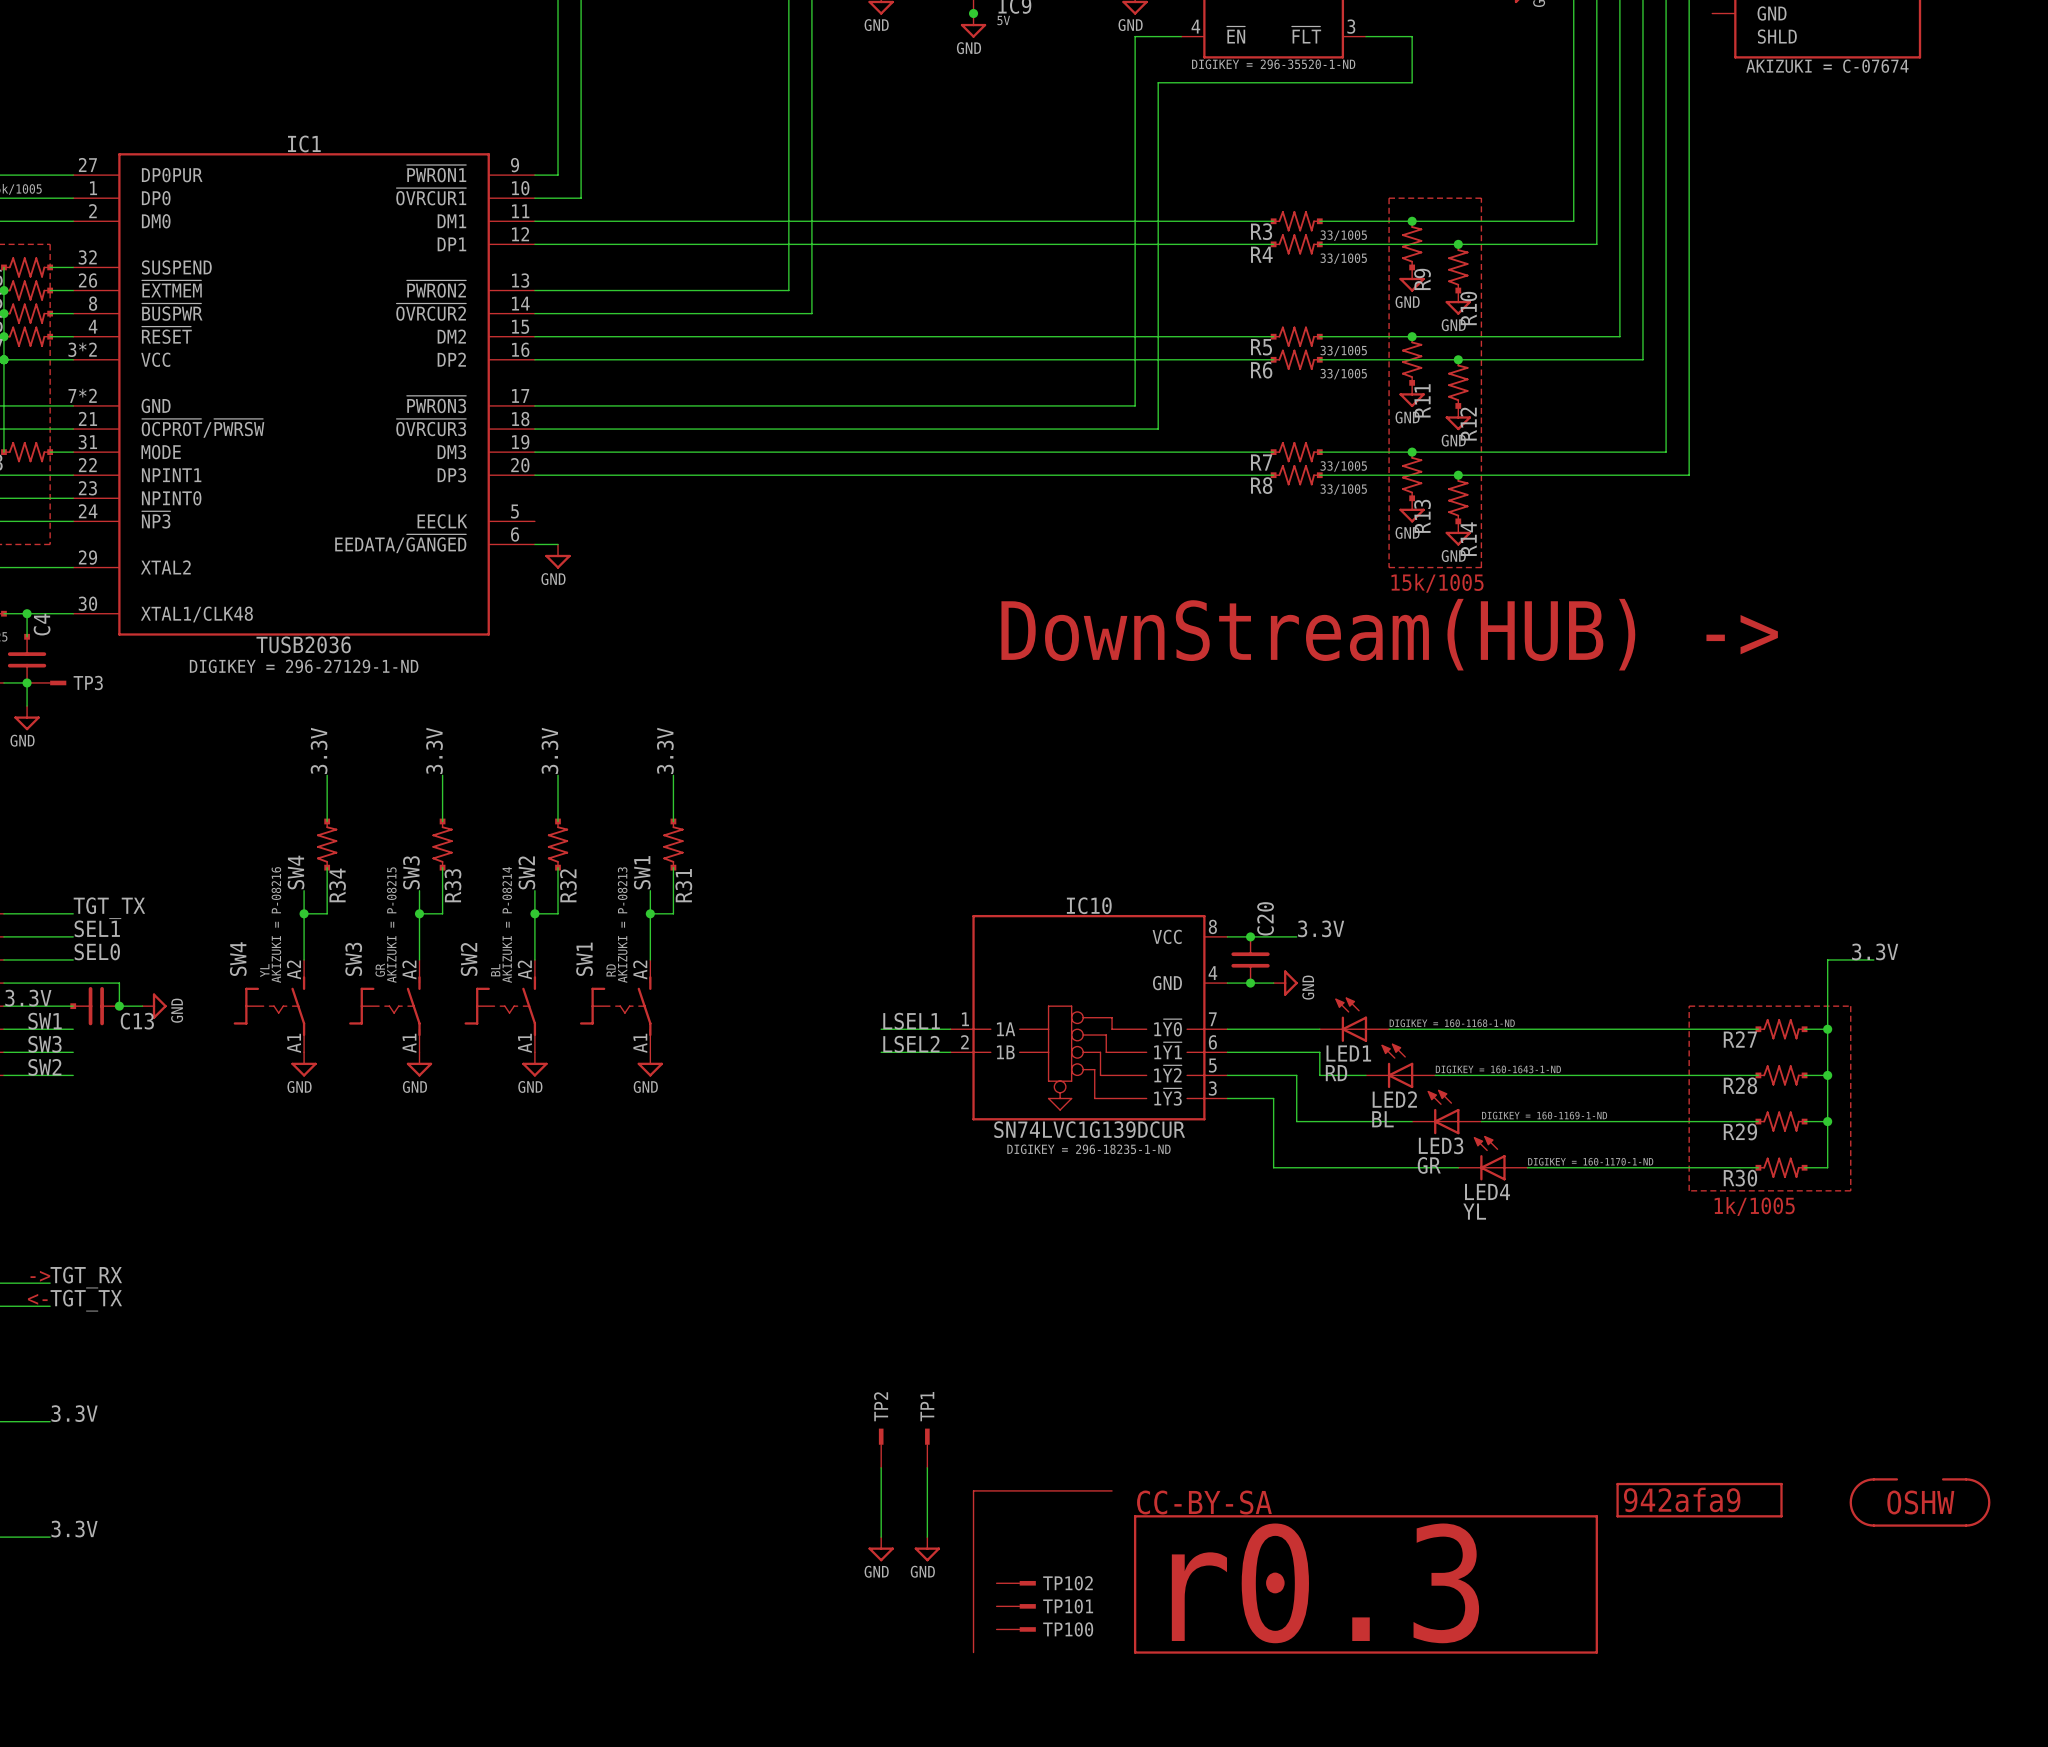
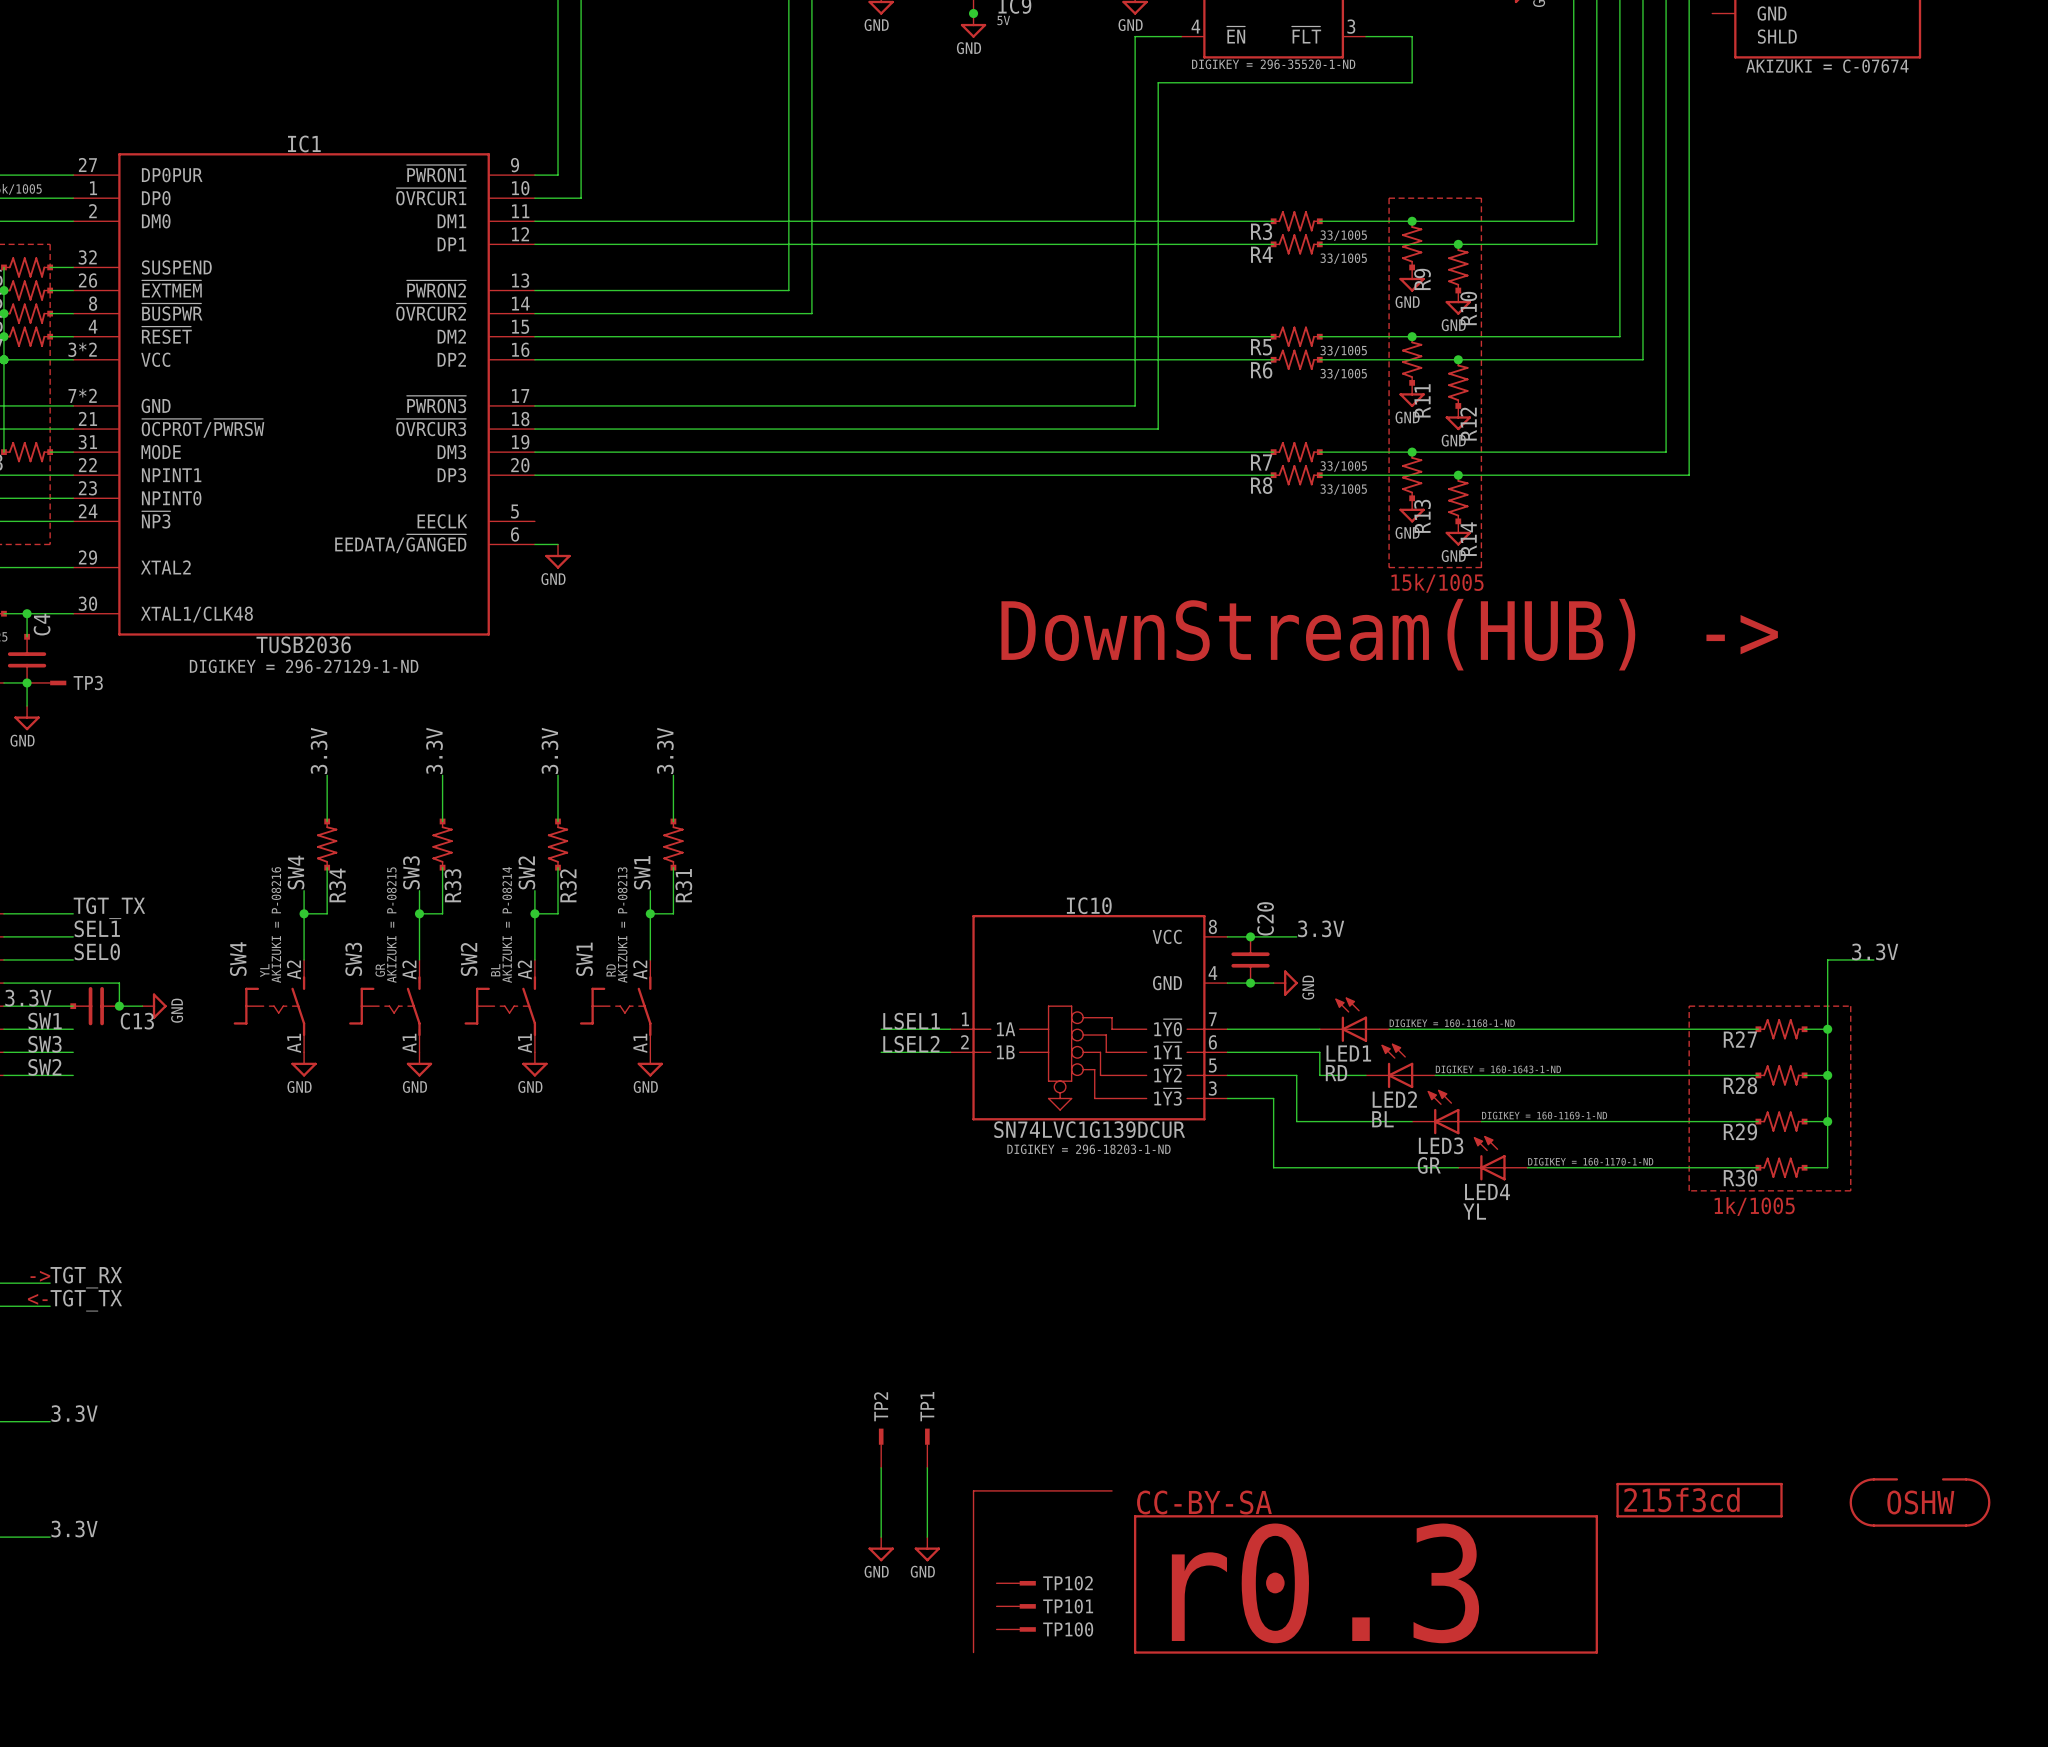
IC10 text: DIGIKEY = 296-18235-1-ND (1088, 1149) -> DIGIKEY = 296-18203-1-ND (1088, 1149)
part value: 942afa9 (1682, 1499) -> 215f3cd (1681, 1499)

